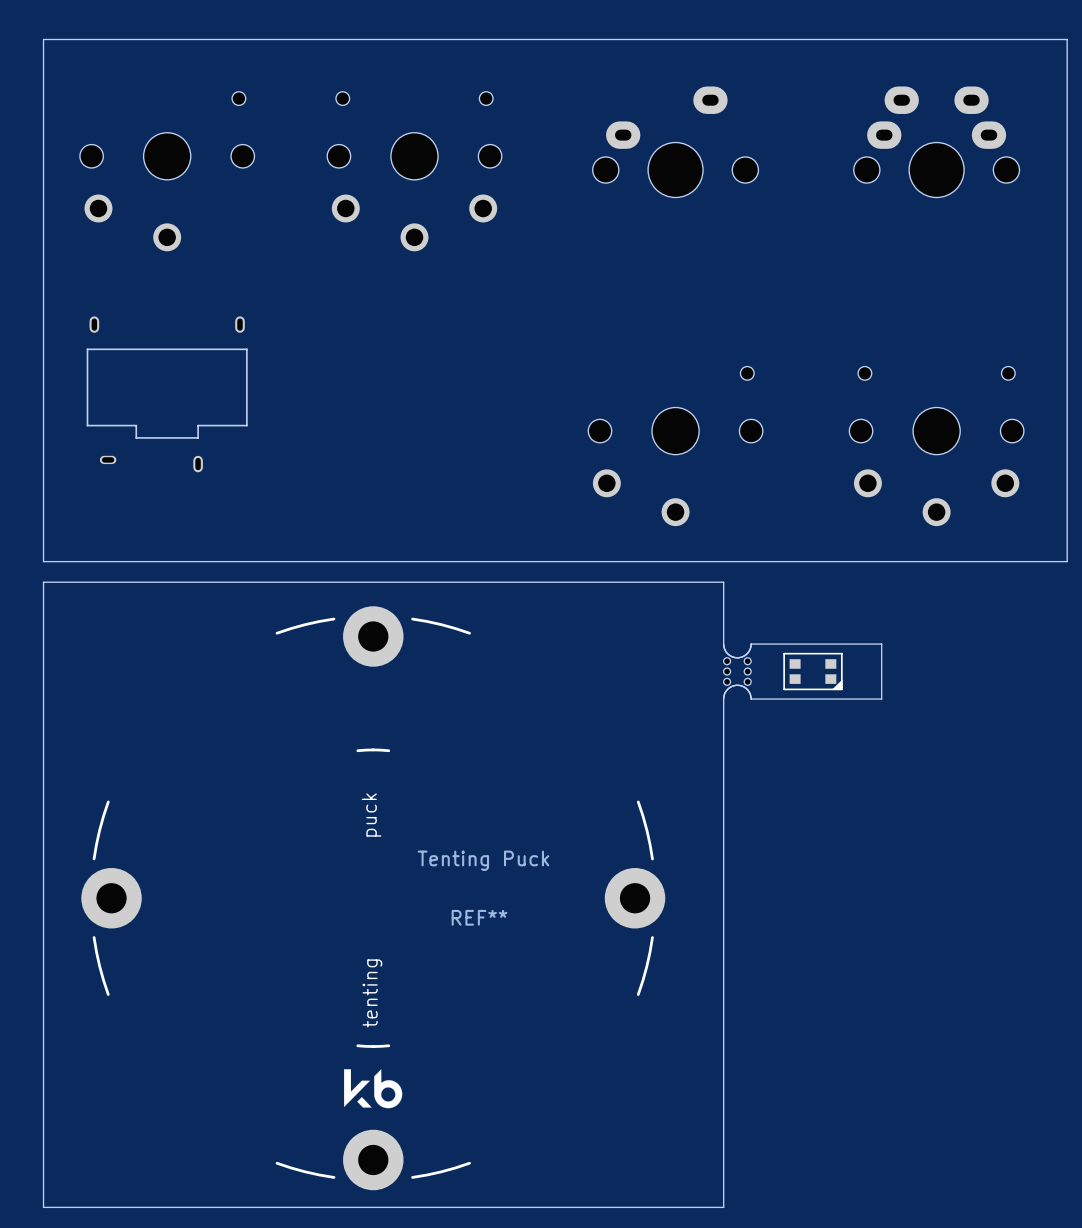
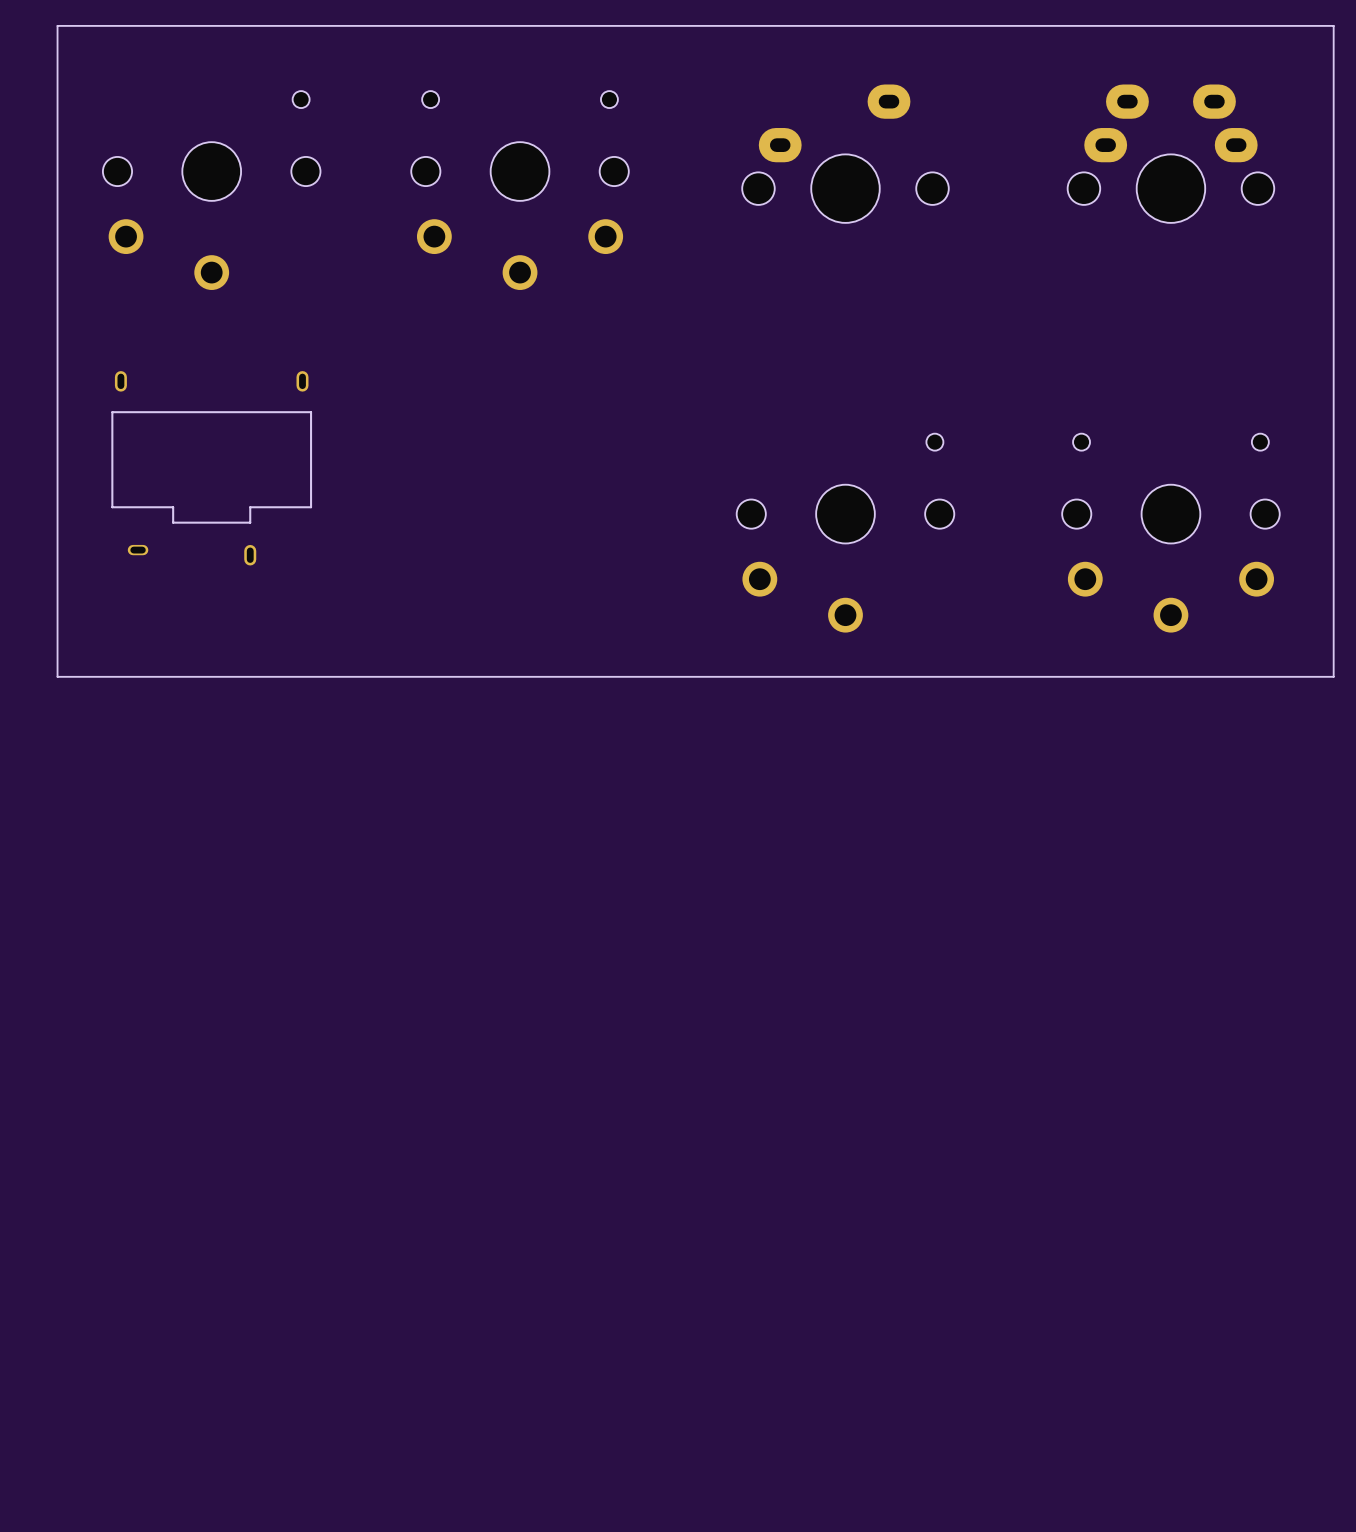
board edge: (43, 582) (43, 1207) (723, 1207) (724, 695) (729, 688) (737, 685) (747, 689) (751, 699) (881, 699) (881, 644) (751, 644) (749, 650) (744, 655) (732, 656) (726, 652) (723, 645) (723, 582) (43, 582) -> none
part: (737, 671) -> none
part: (812, 671) -> none
REF**: Tenting Puck (373, 898) -> none

